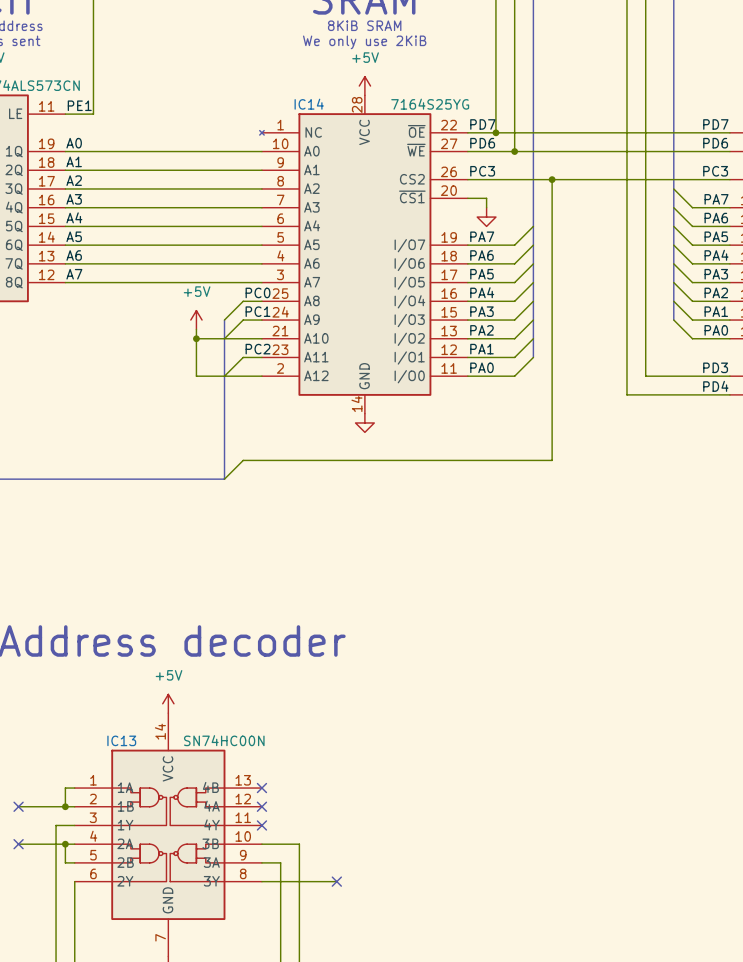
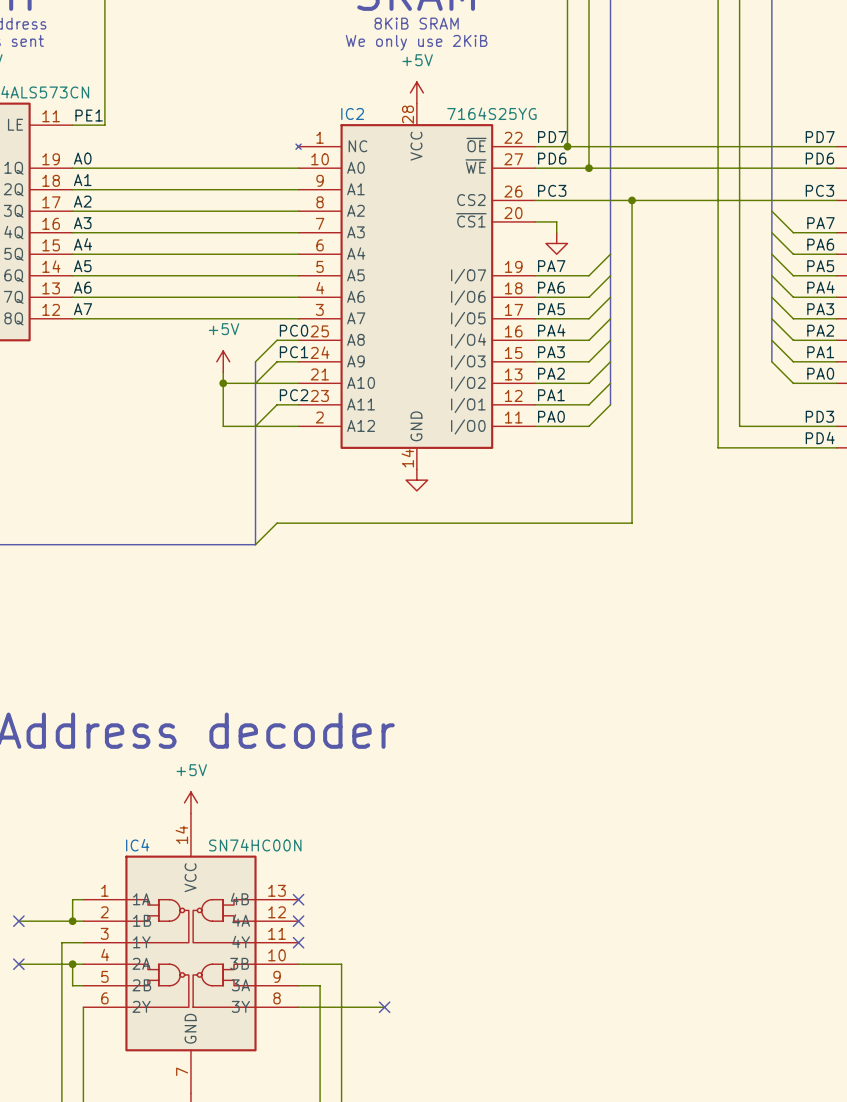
IC14 name: IC14 (309, 104) -> IC2 (352, 113)
IC13 name: IC13 (121, 740) -> IC4 (137, 845)

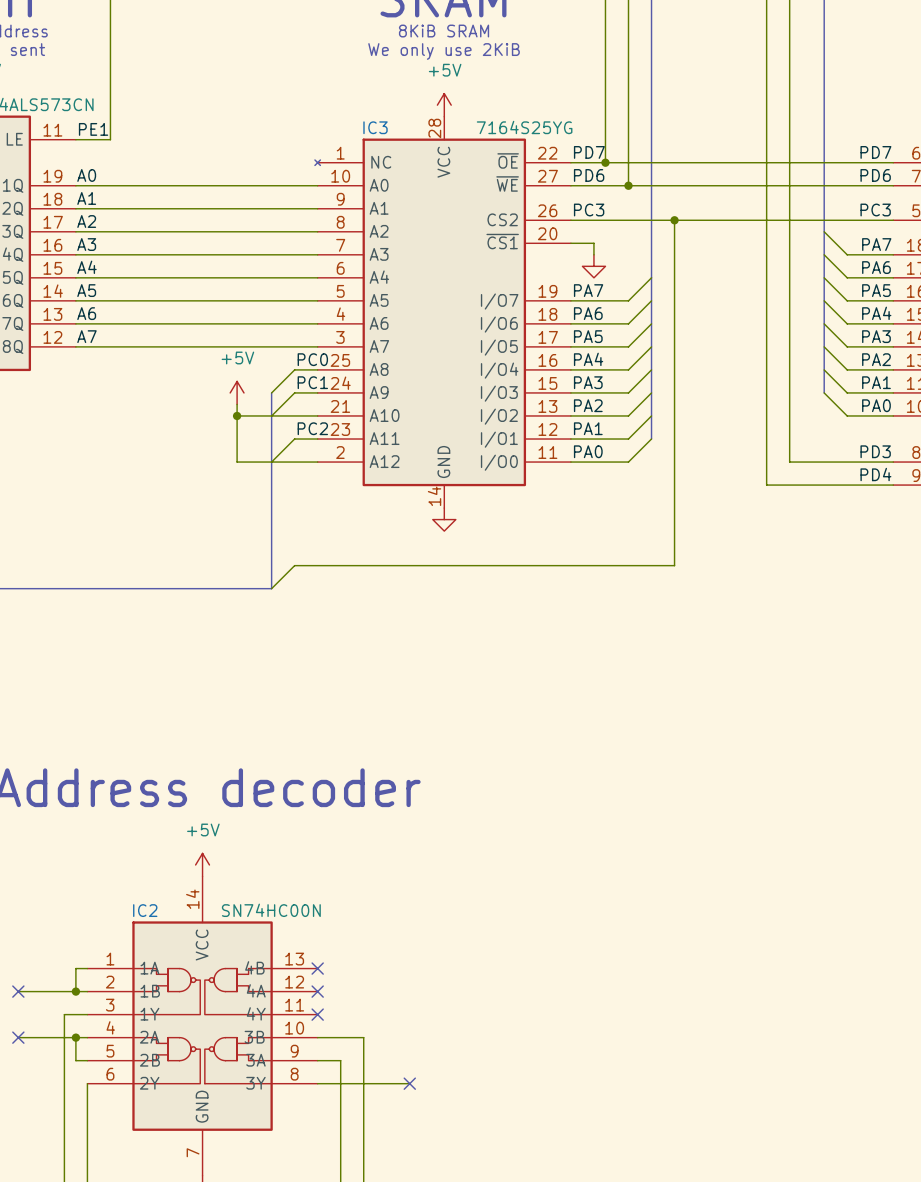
IC2 name: IC2 (352, 113) -> IC3 (375, 127)
IC4 name: IC4 (137, 845) -> IC2 (145, 910)

